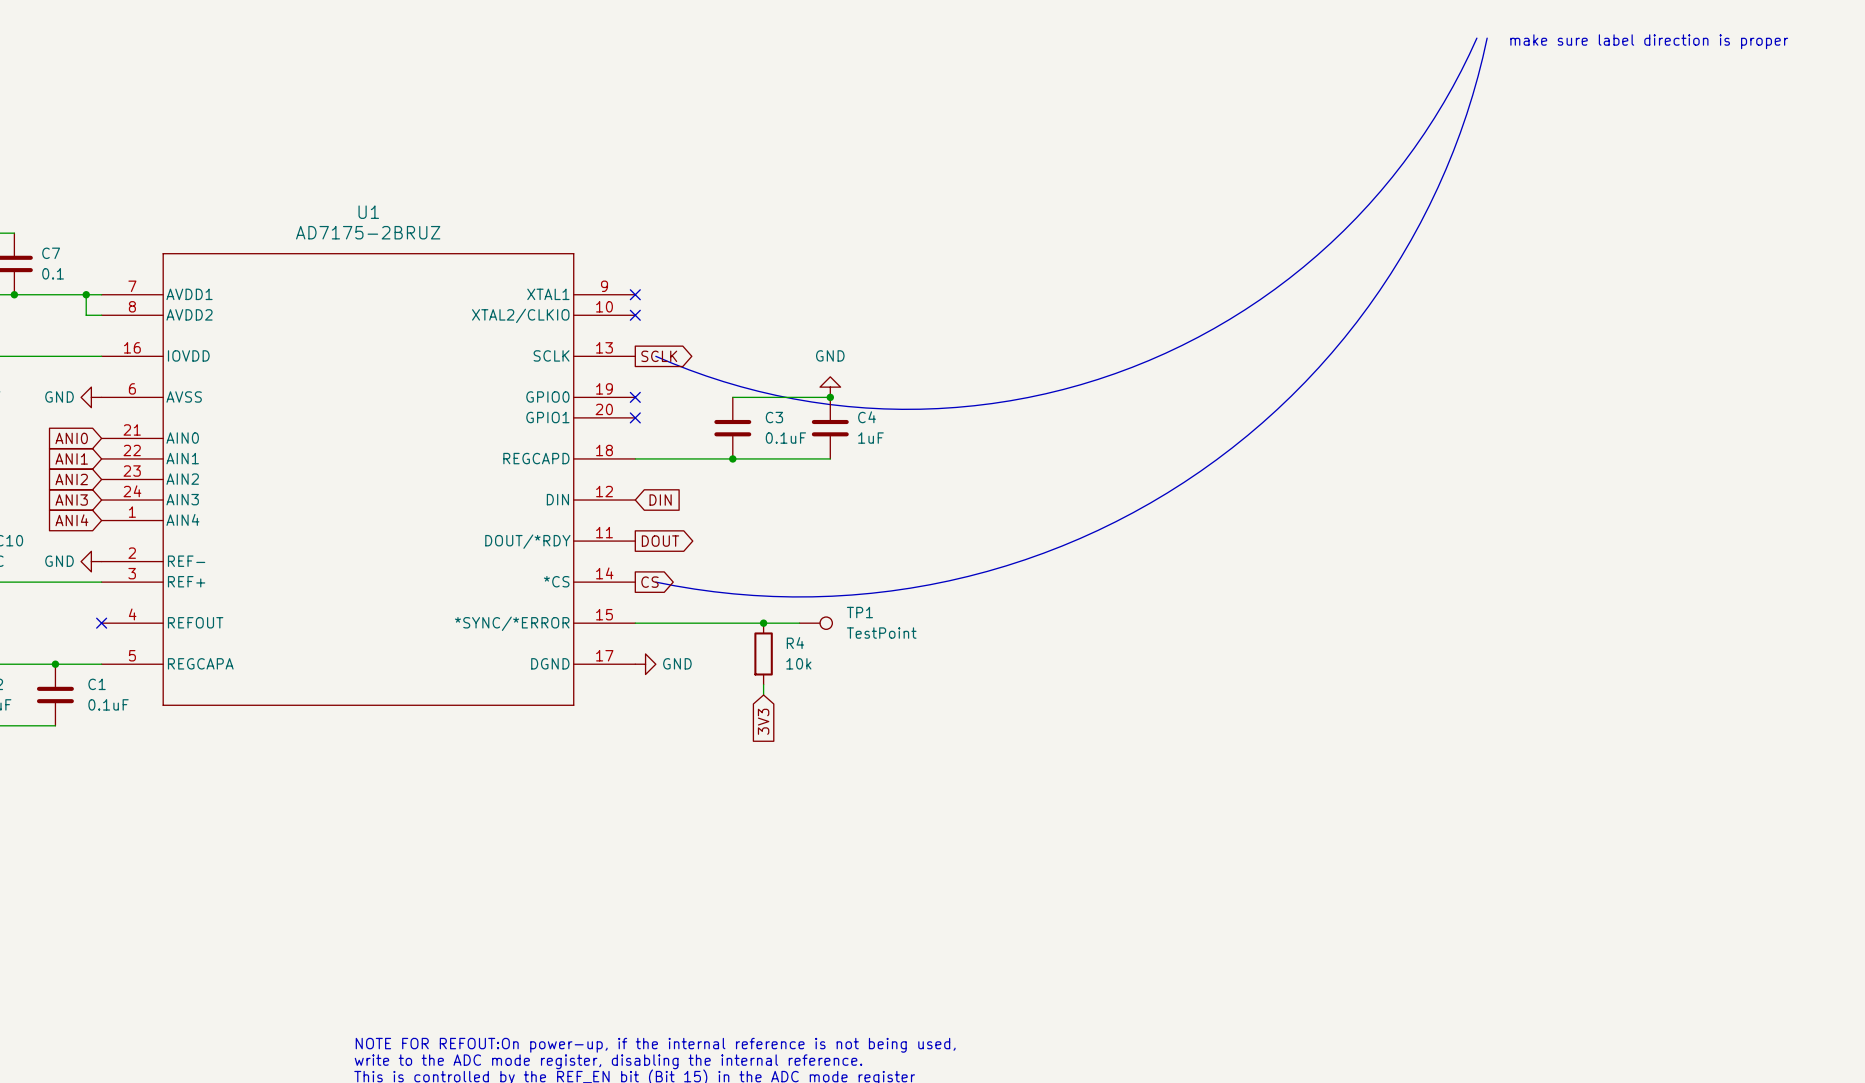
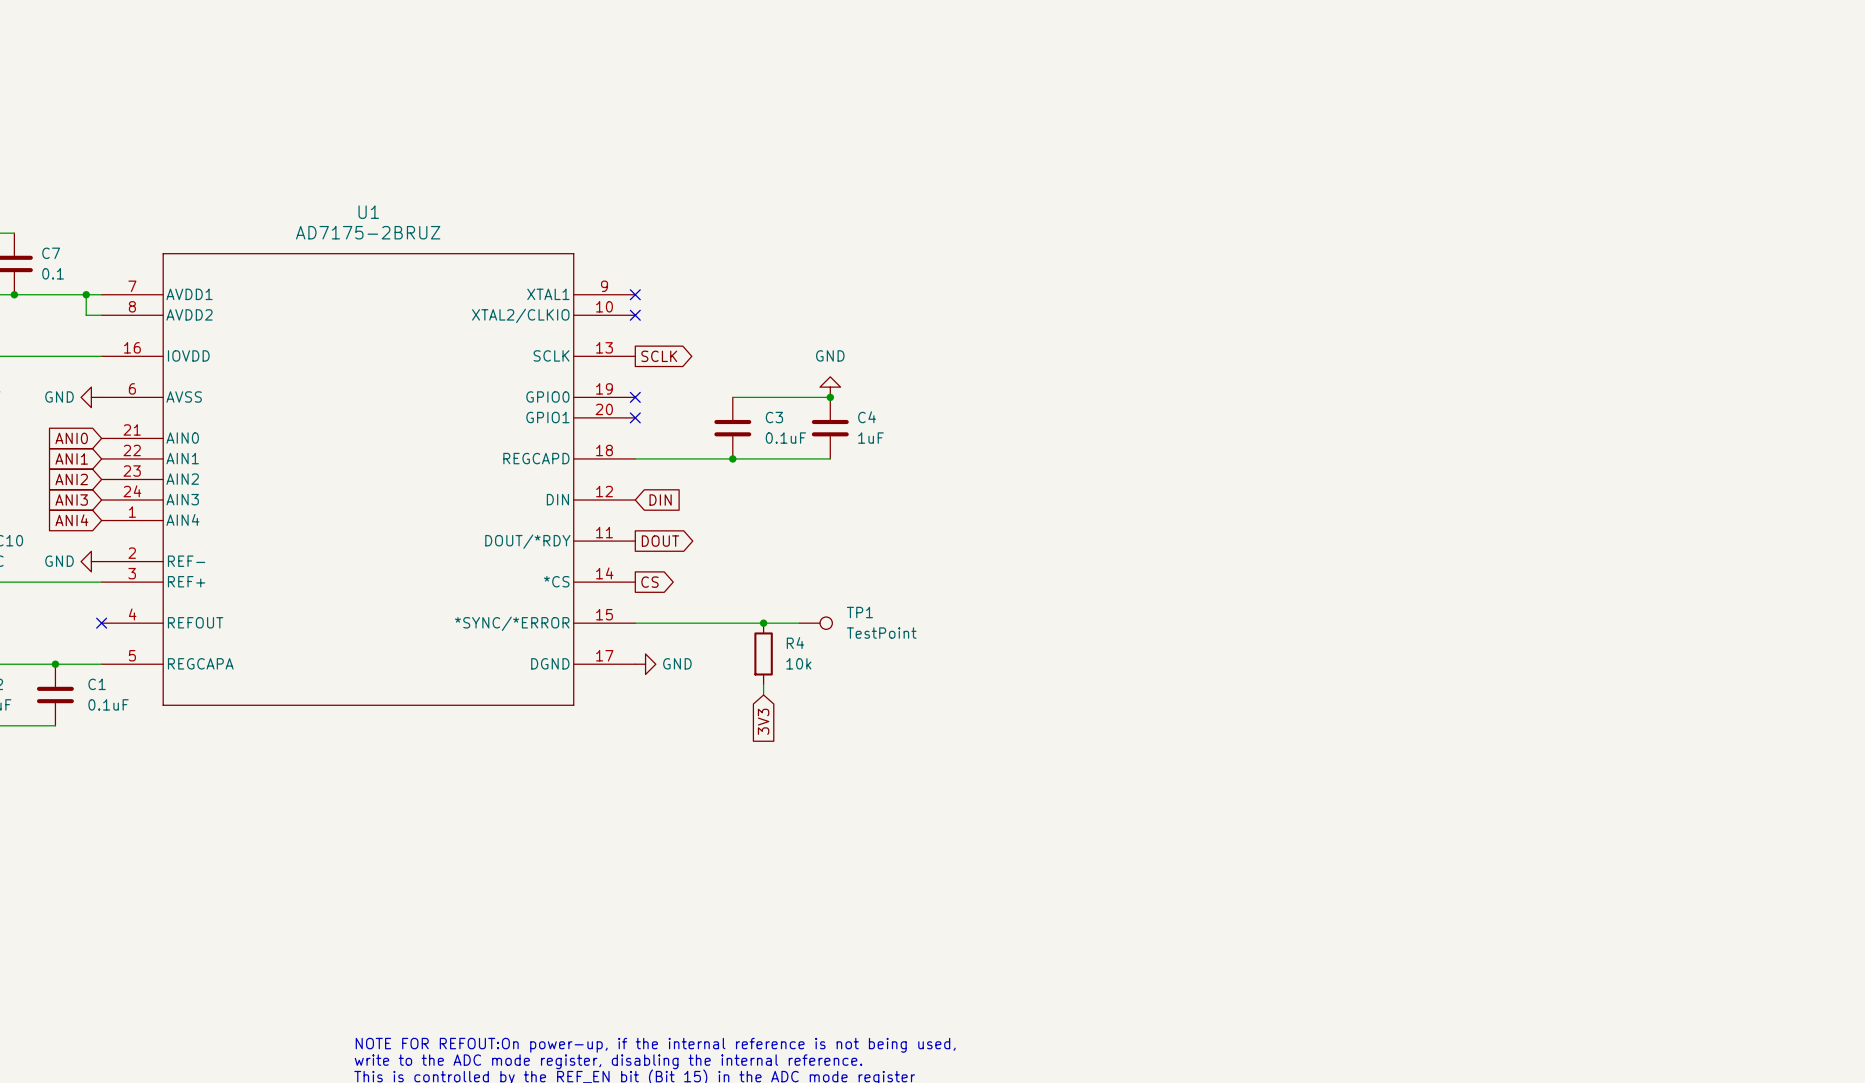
line: (1476, 38) (1452, 86) (1414, 148) (1368, 204) (1330, 243) (1289, 278) (1245, 309) (1198, 337) (1132, 367) (1080, 384) (1028, 397) (956, 407) (902, 409) (829, 404) (776, 395) (723, 381) (655, 356) -> none
line: (1487, 38) (1466, 114) (1445, 169) (1420, 222) (1379, 290) (1331, 352) (1291, 395) (1247, 435) (1184, 482) (1133, 512) (1062, 546) (987, 571) (929, 584) (851, 595) (792, 596) (714, 591) (655, 582) -> none
text: make sure label direction is proper (1649, 41) -> none

